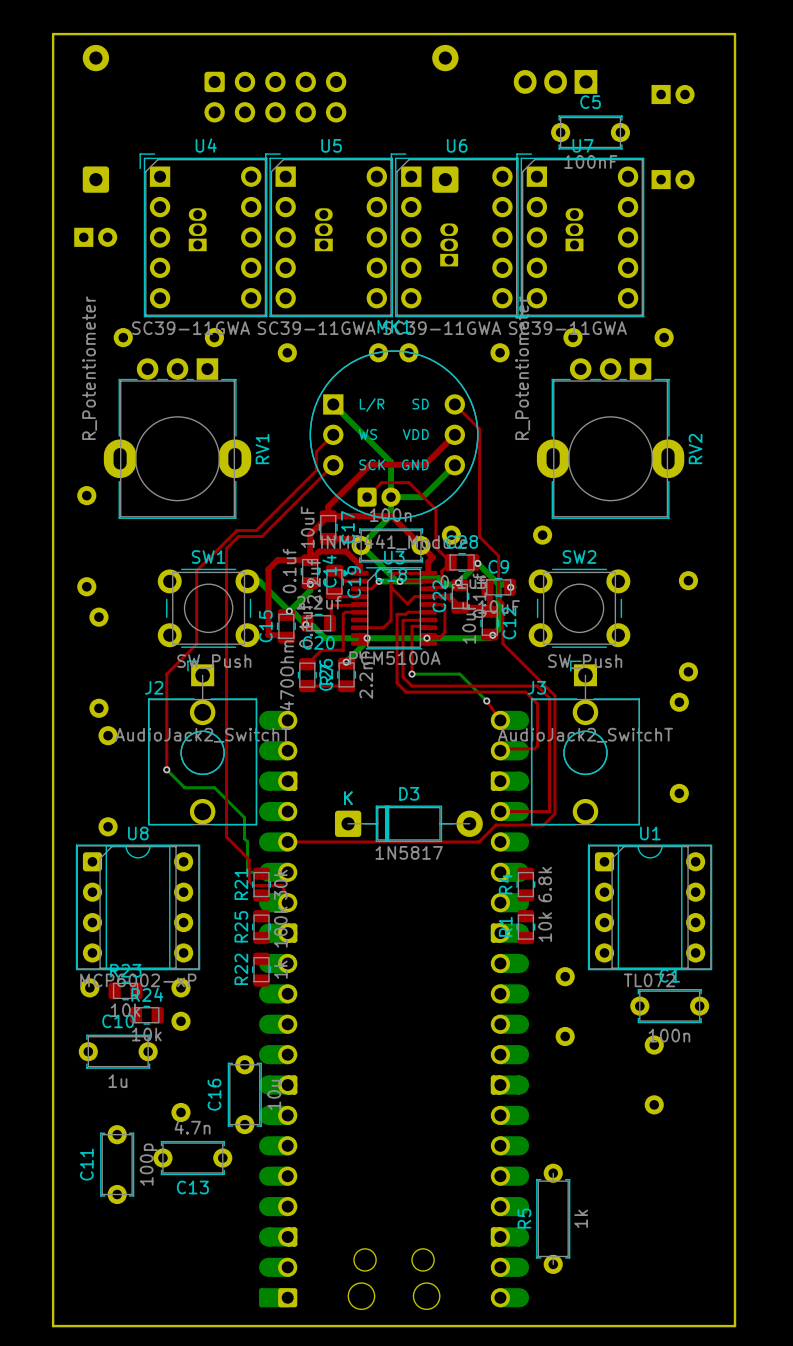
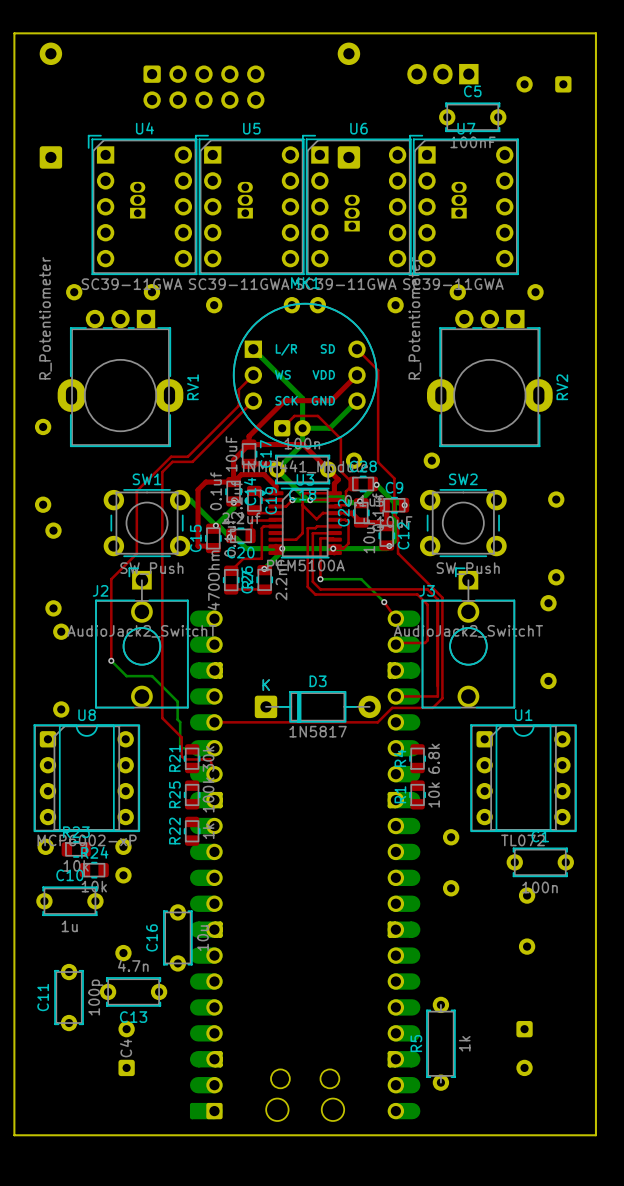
part footprint: [651, 84, 695, 105] -> [516, 76, 572, 93]
part: (673, 179) -> none
part: (95, 237) -> none
C4: none -> (126, 1048)
part: none -> (524, 1048)

